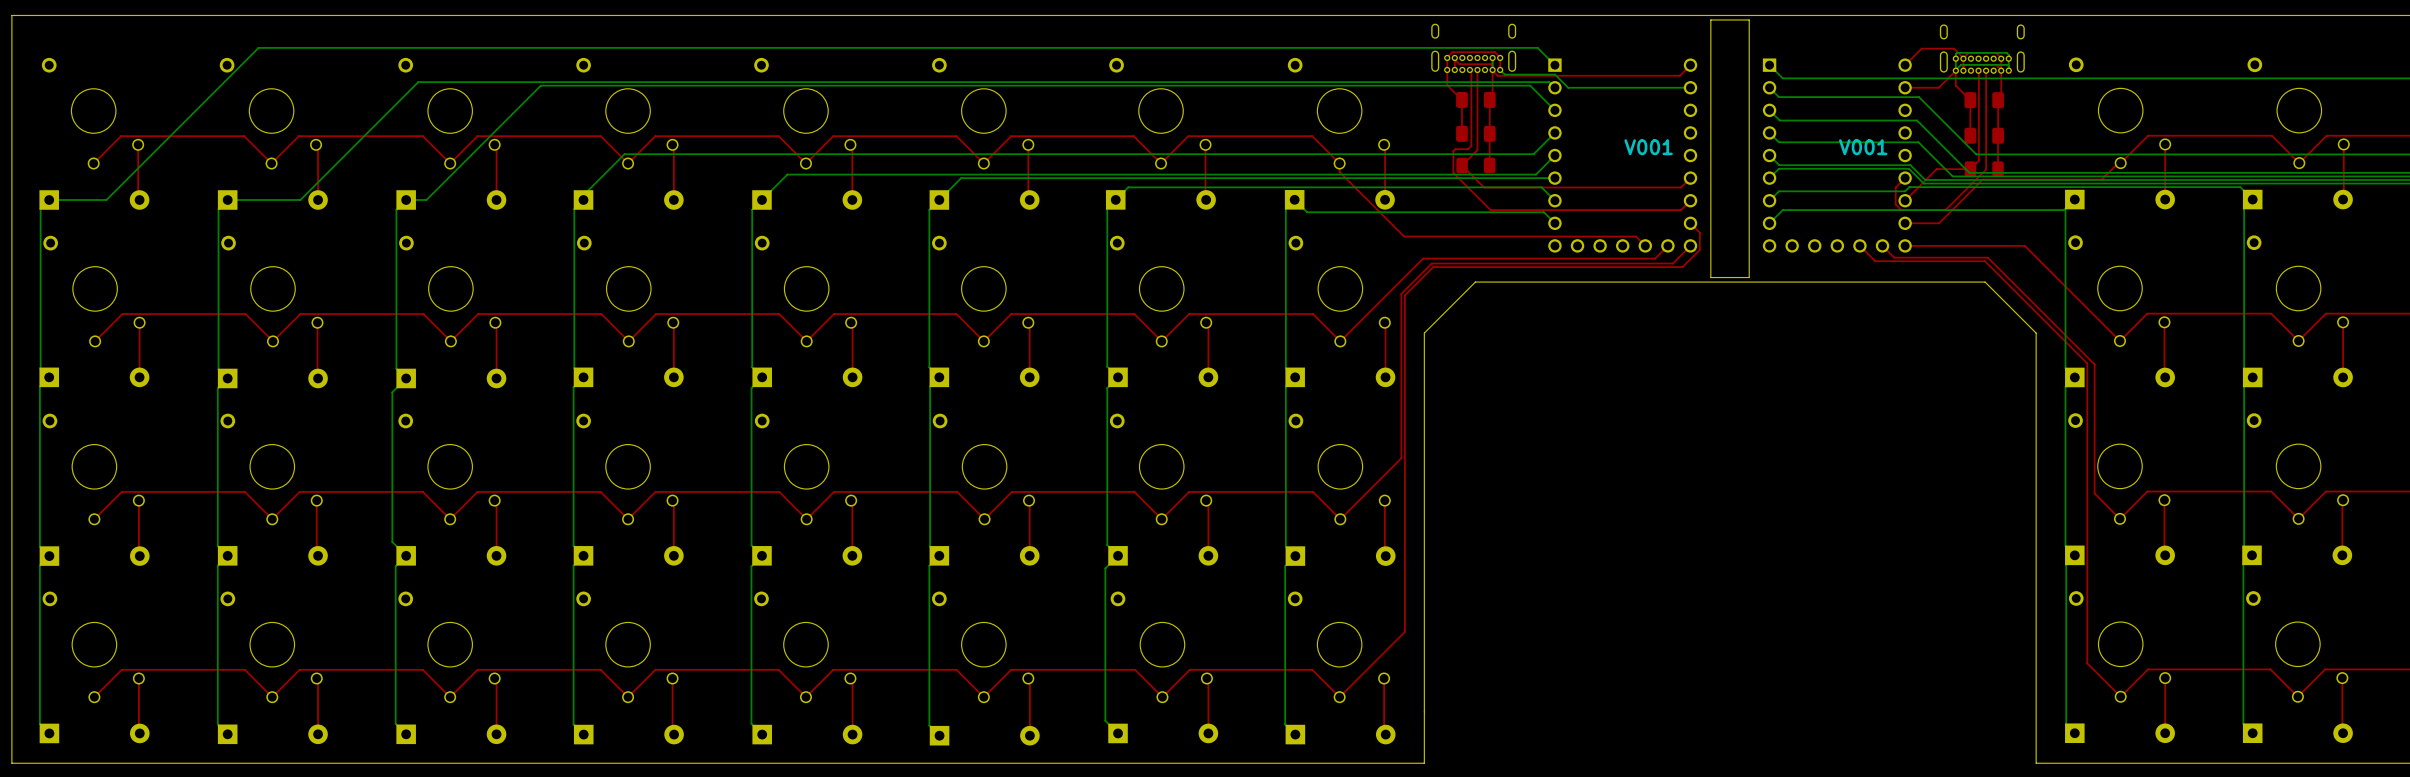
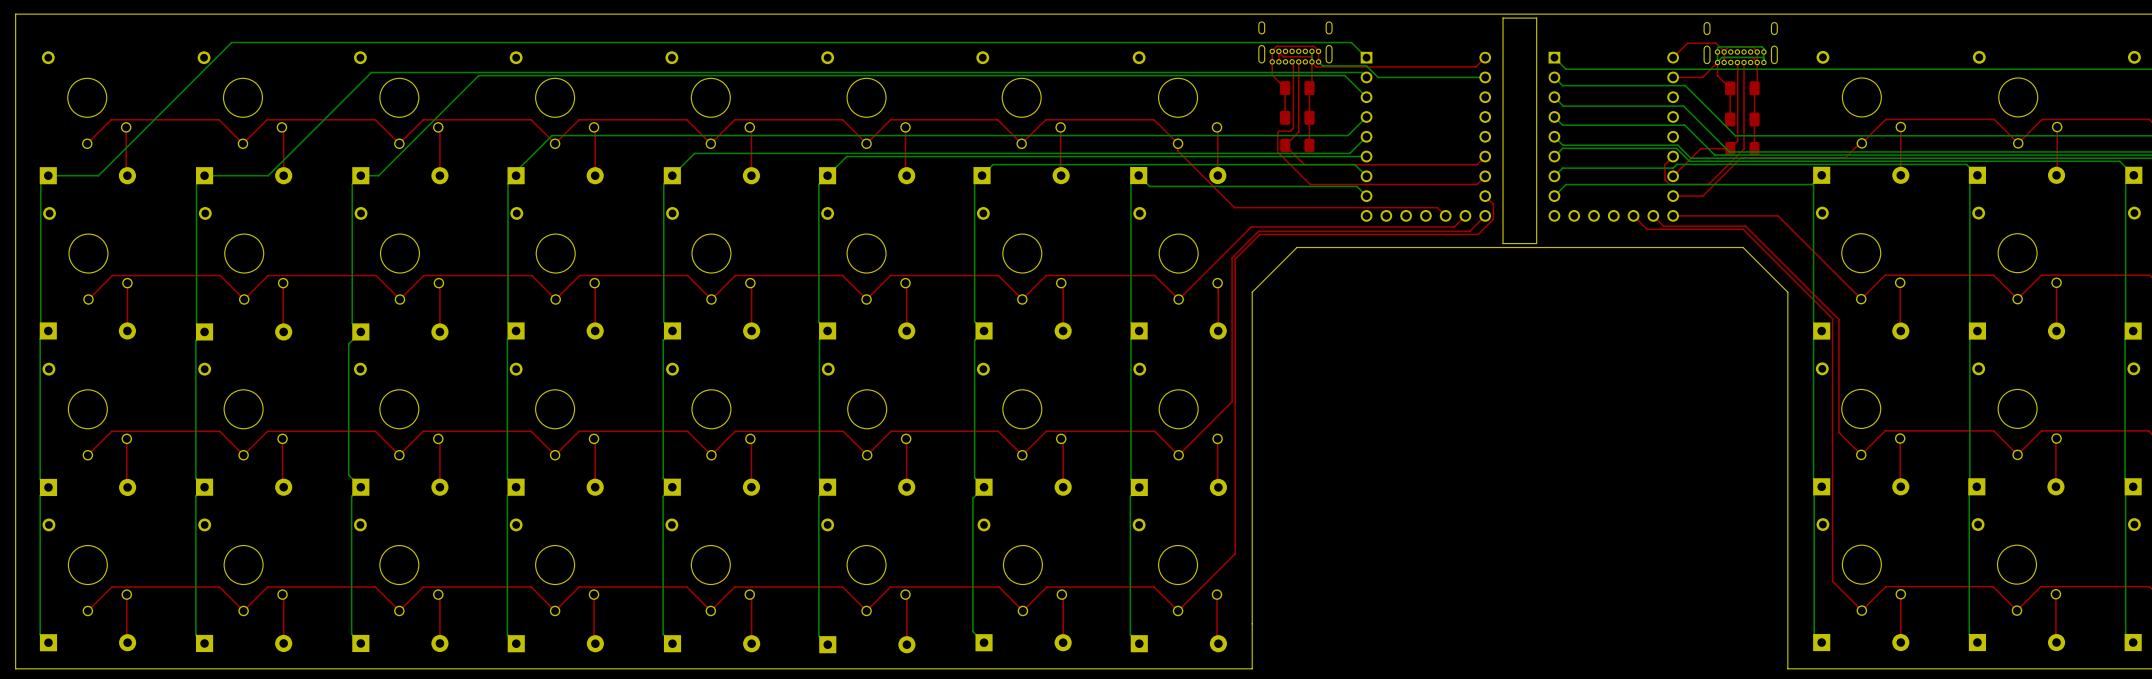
text: V001 (1648, 147) -> none
text: V001 (1863, 147) -> none

